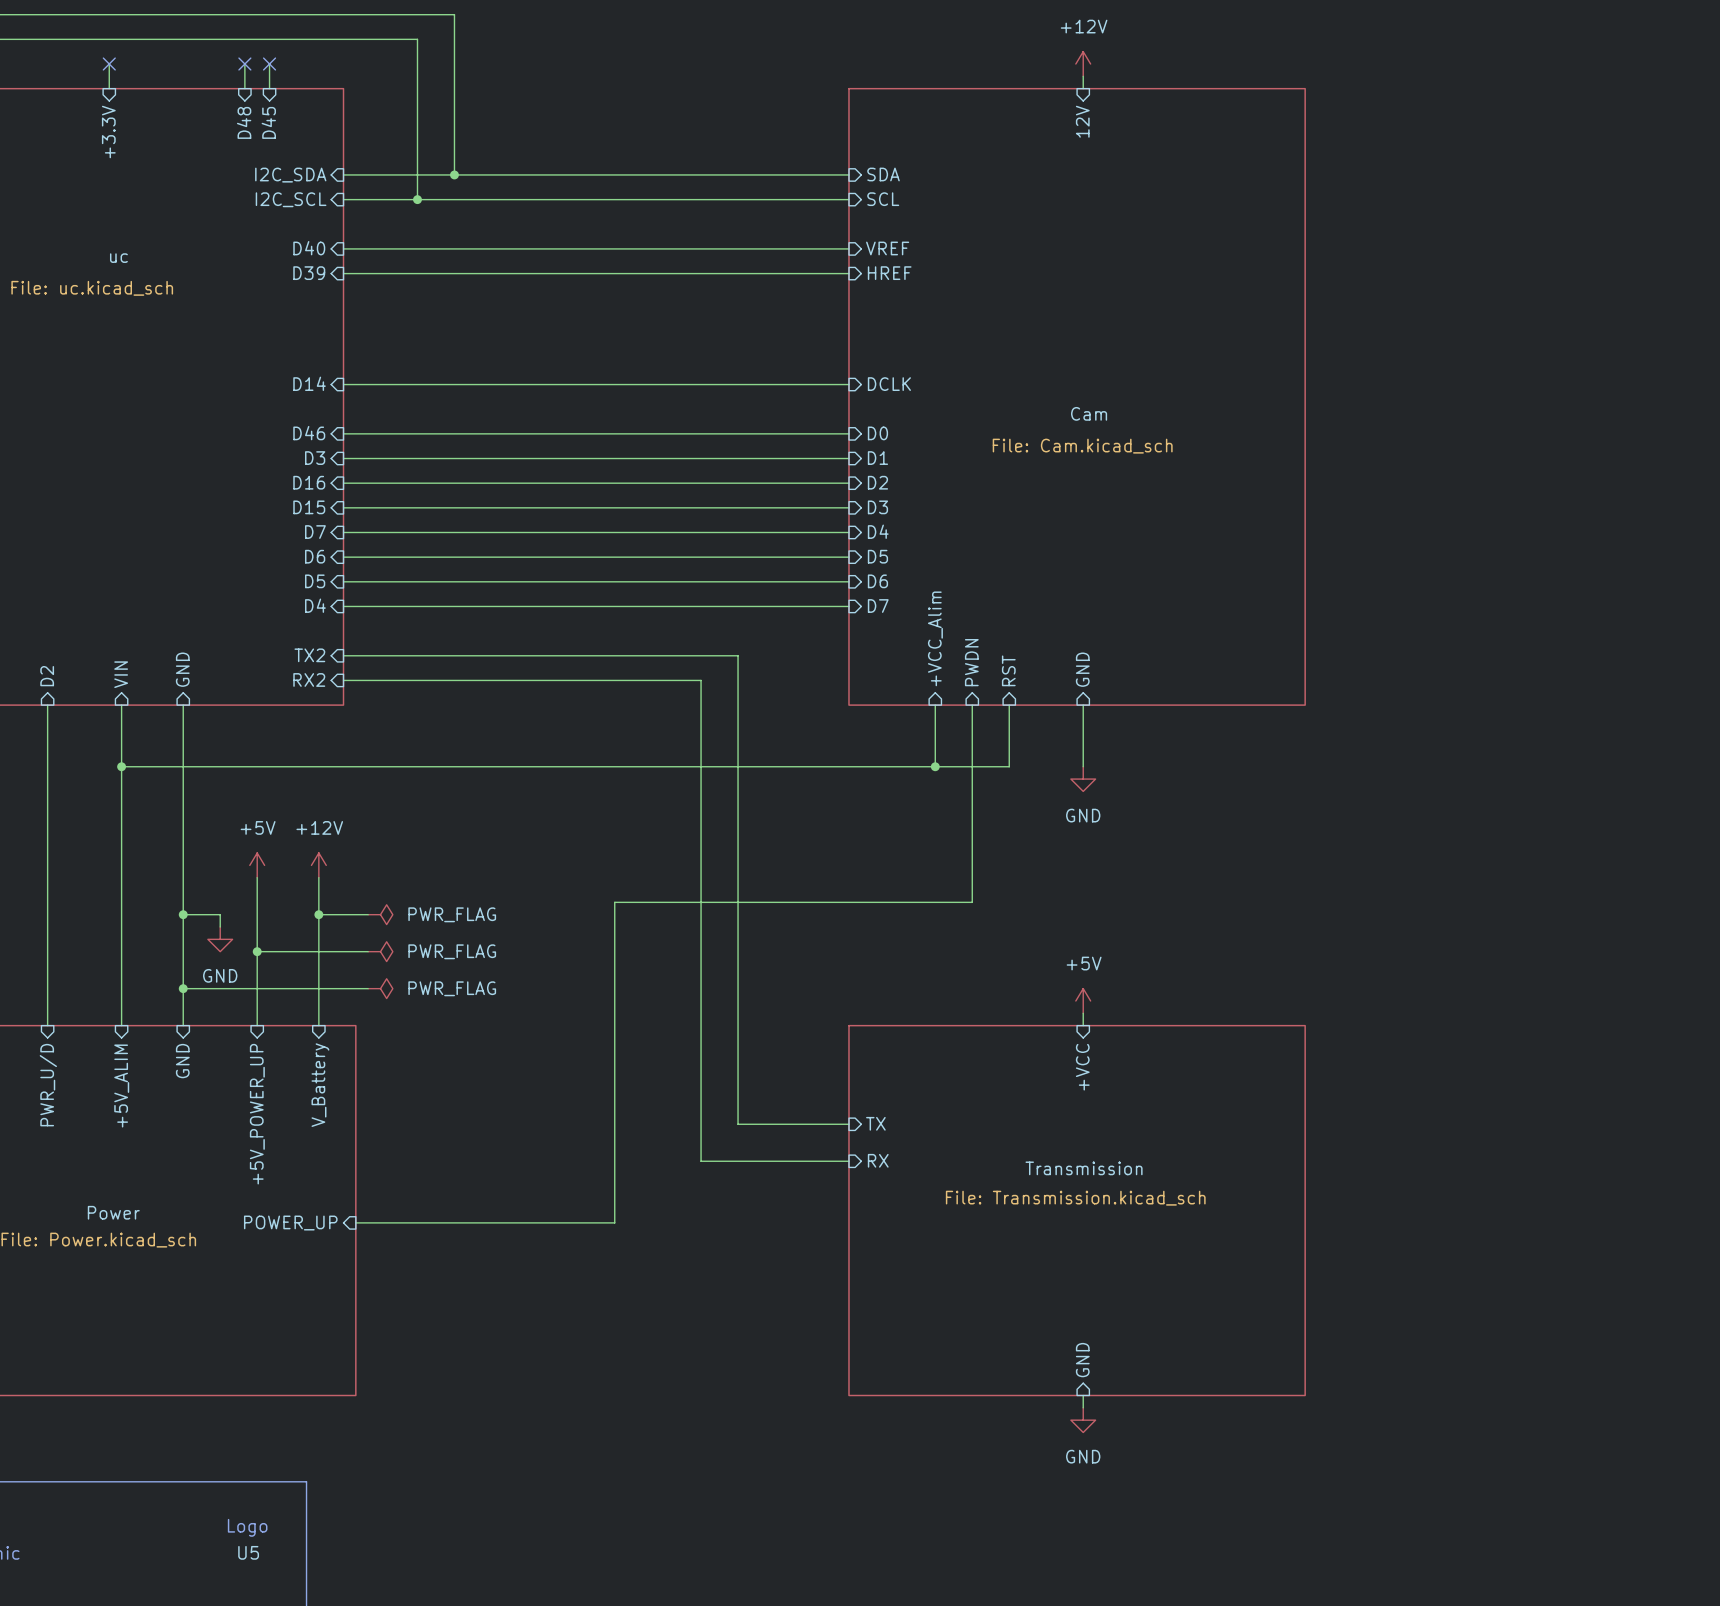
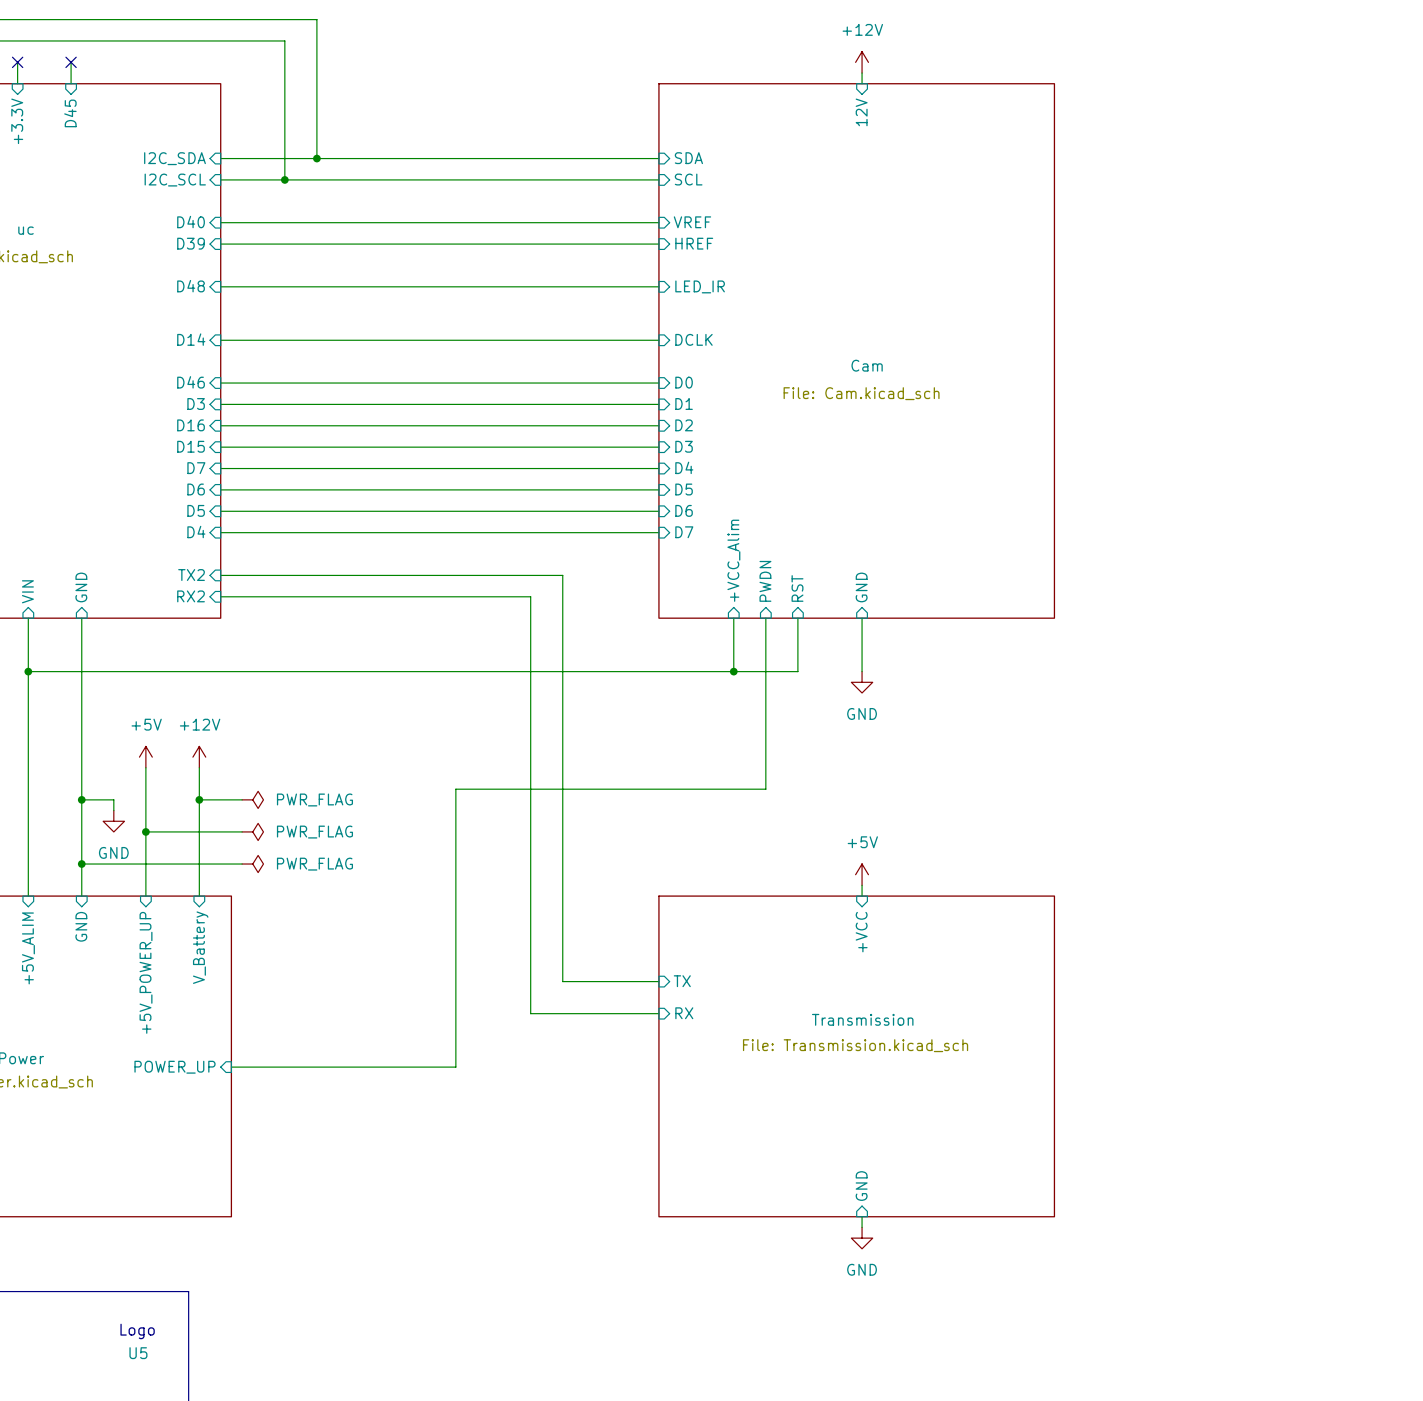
no-connect mark: none -> (71, 62)
wire: (244, 64) (244, 88) -> (71, 62) (71, 83)
no-connect mark: (244, 64) -> none
wire: (269, 64) (269, 88) -> none
no-connect mark: (269, 64) -> none
sheet pin rotation: 0° (244, 122) -> 90° clockwise (191, 286)
sheet pin position: D48 (244, 122) -> D48 (191, 286)
sheet pin position: D45 (268, 122) -> D45 (70, 113)
wire: none -> (220, 286) (658, 286)
sheet pin: none -> LED_IR (700, 286)

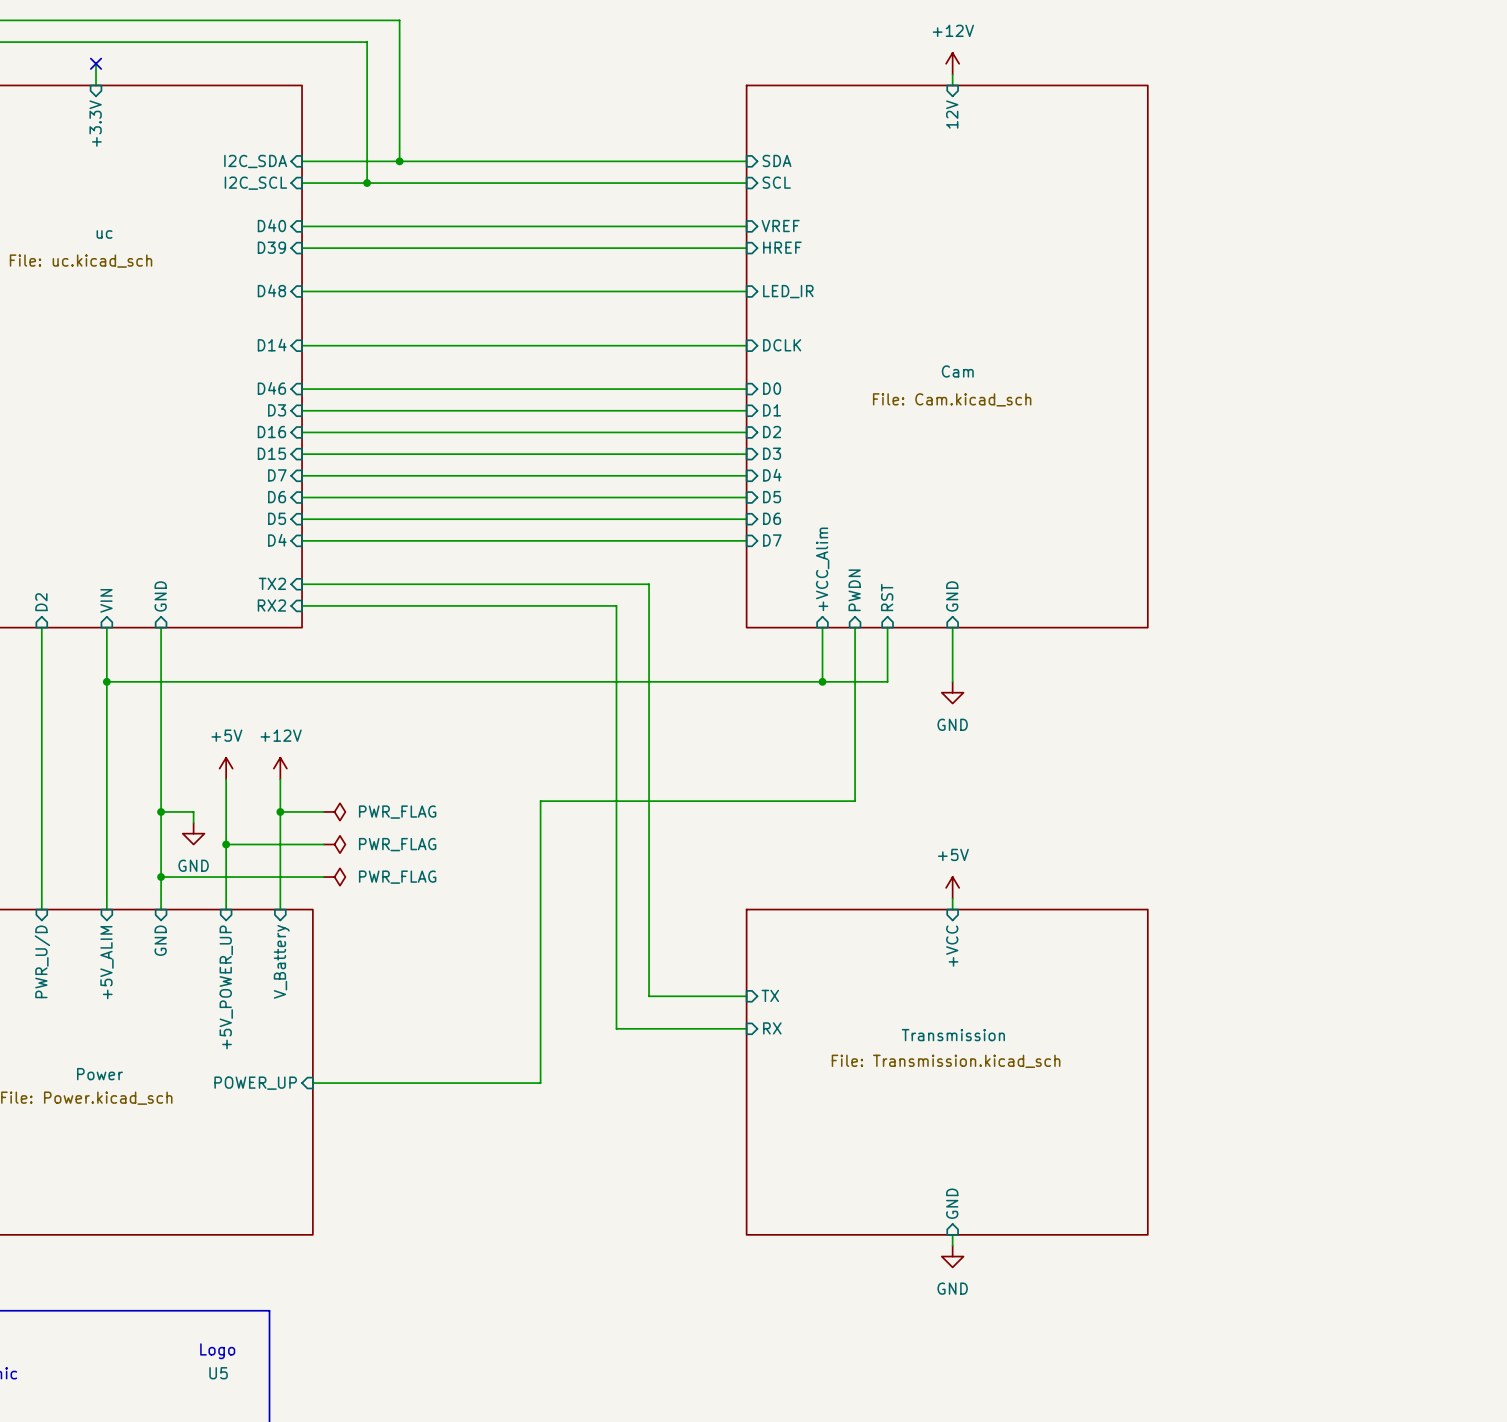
wire: (71, 62) (71, 83) -> none
no-connect mark: (71, 62) -> none
sheet pin: D45 (70, 113) -> none

